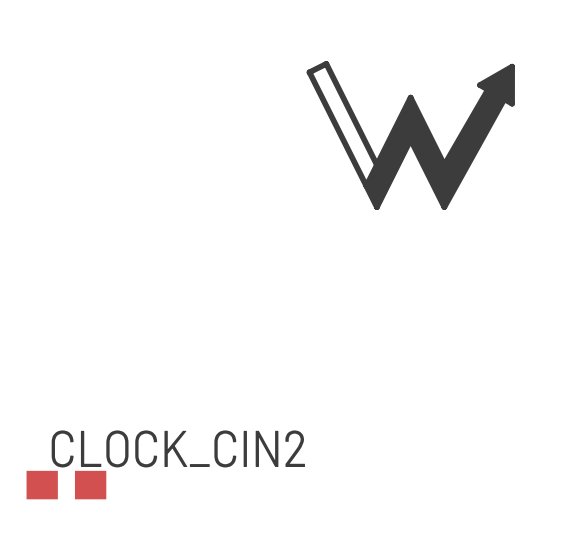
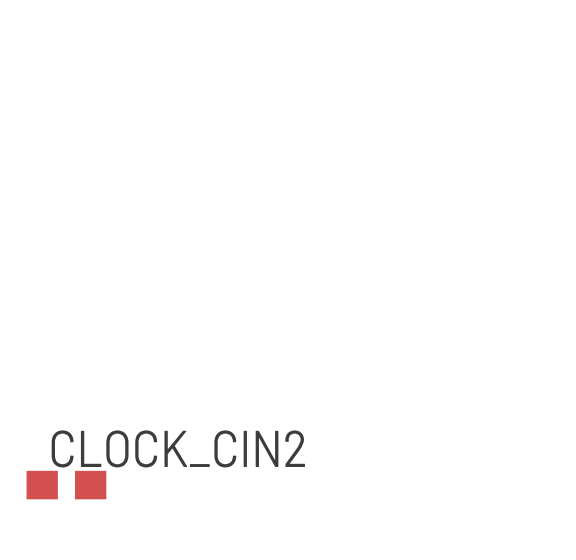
drawing: [306, 61, 515, 210] -> none

